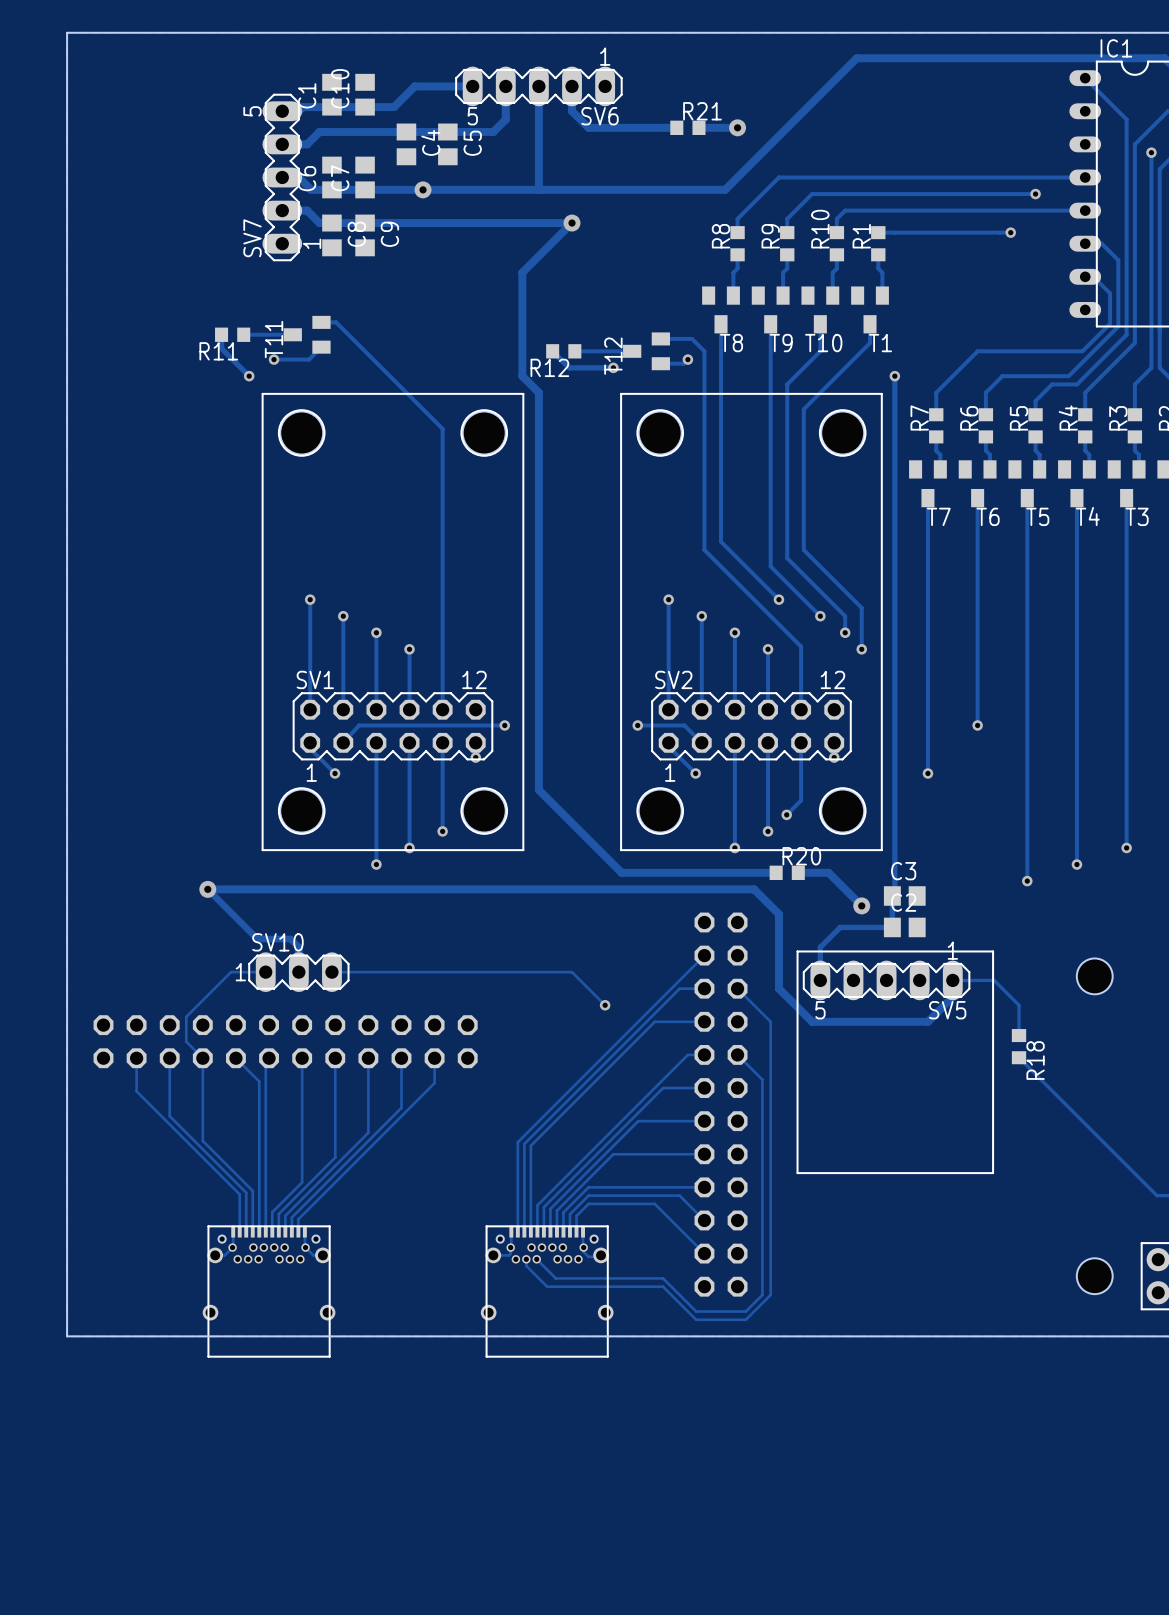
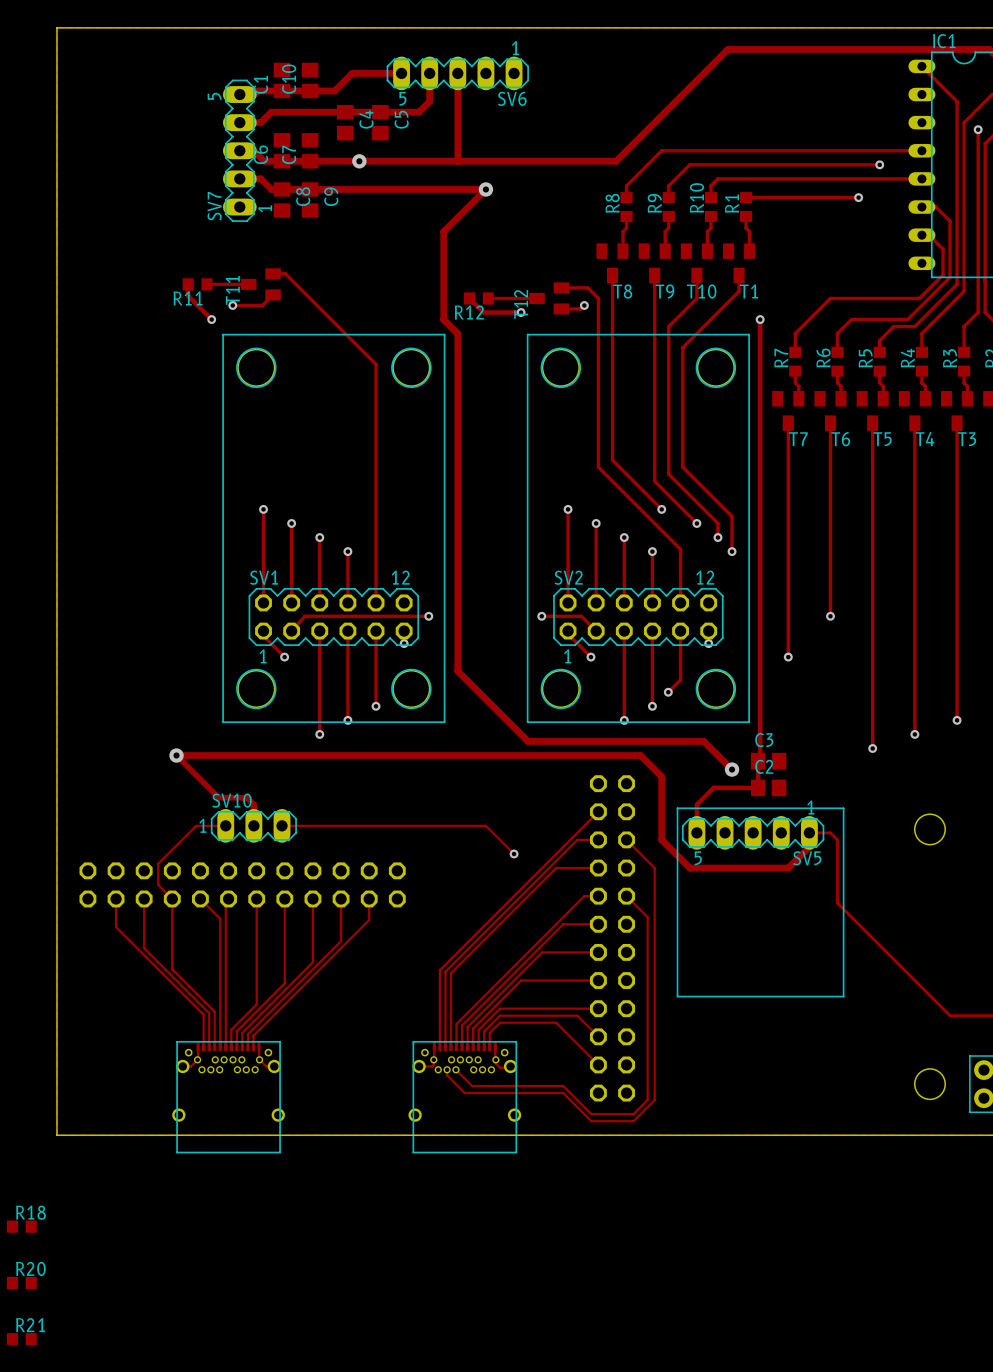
track: (572, 86) (572, 111) (588, 127) (676, 127) -> none
R21 position: (687, 127) -> (21, 1339)
track: (698, 127) (737, 127) -> none
via: (737, 127) -> none
track: none -> (659, 741) (678, 741)
R20 position: (787, 872) -> (21, 1282)
track: (977, 980) (994, 980) (1019, 1005) (1019, 1035) -> none
R18 rotation: 0° (1019, 1046) -> 90° clockwise (21, 1226)
R18 position: (1019, 1046) -> (21, 1226)
track: (1019, 1057) (1156, 1195) -> (830, 832) (837, 839) (837, 903) (950, 1015) (982, 1015)
R18 name position: R18 (1035, 1060) -> R18 (30, 1212)

